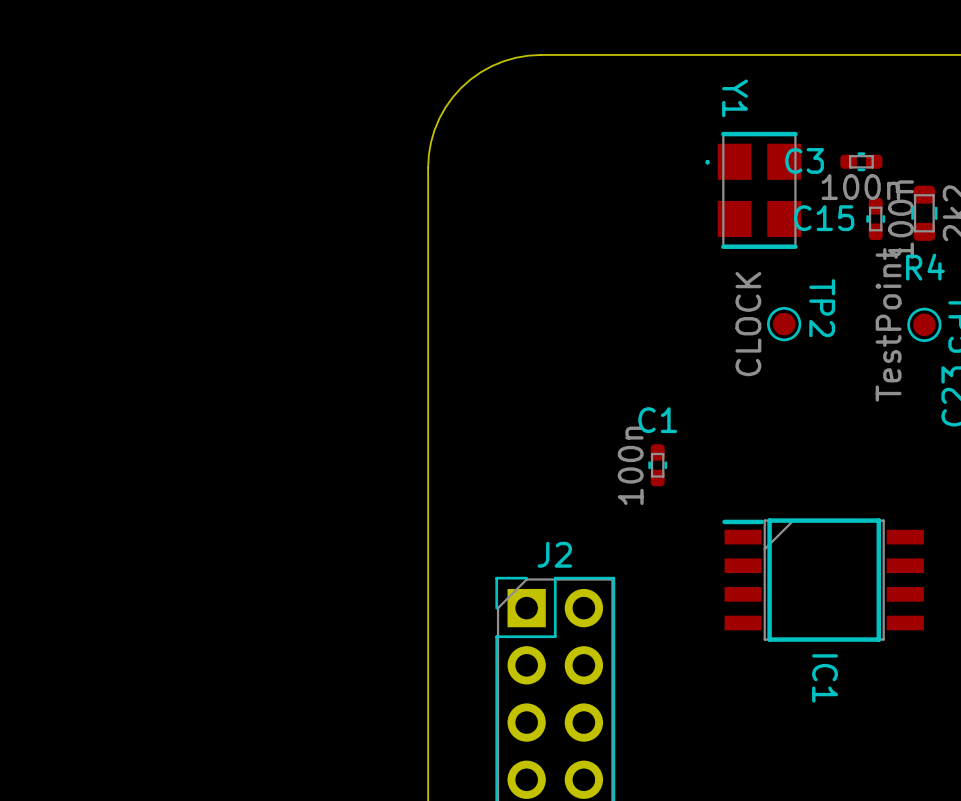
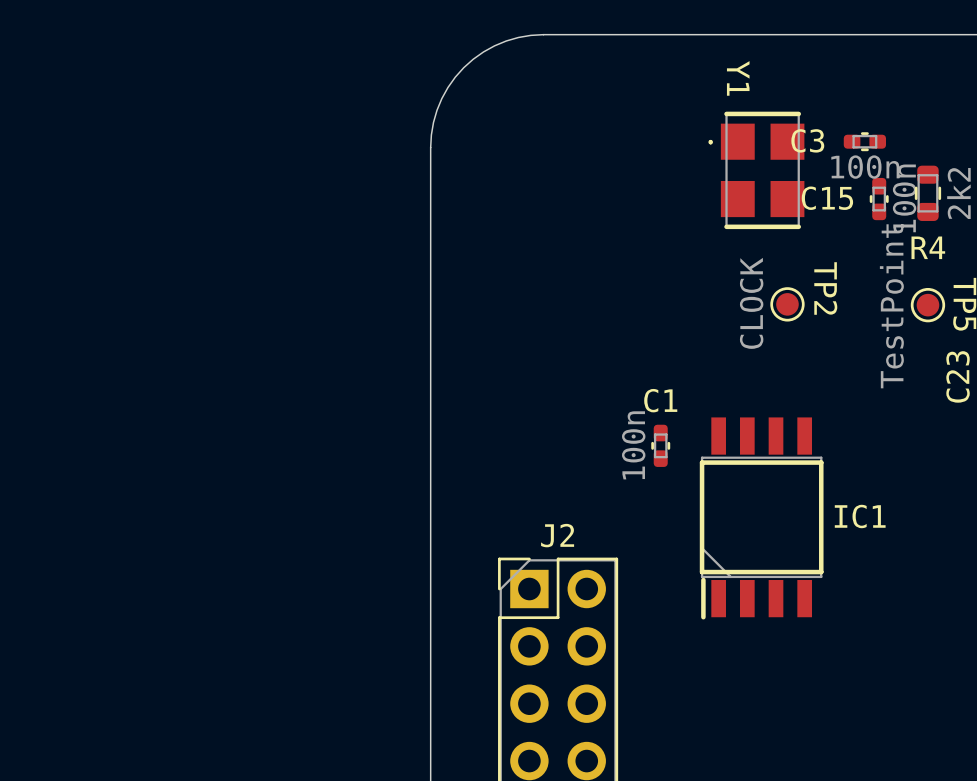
IC1 rotation: 0° (823, 580) -> 90° counterclockwise (761, 518)

